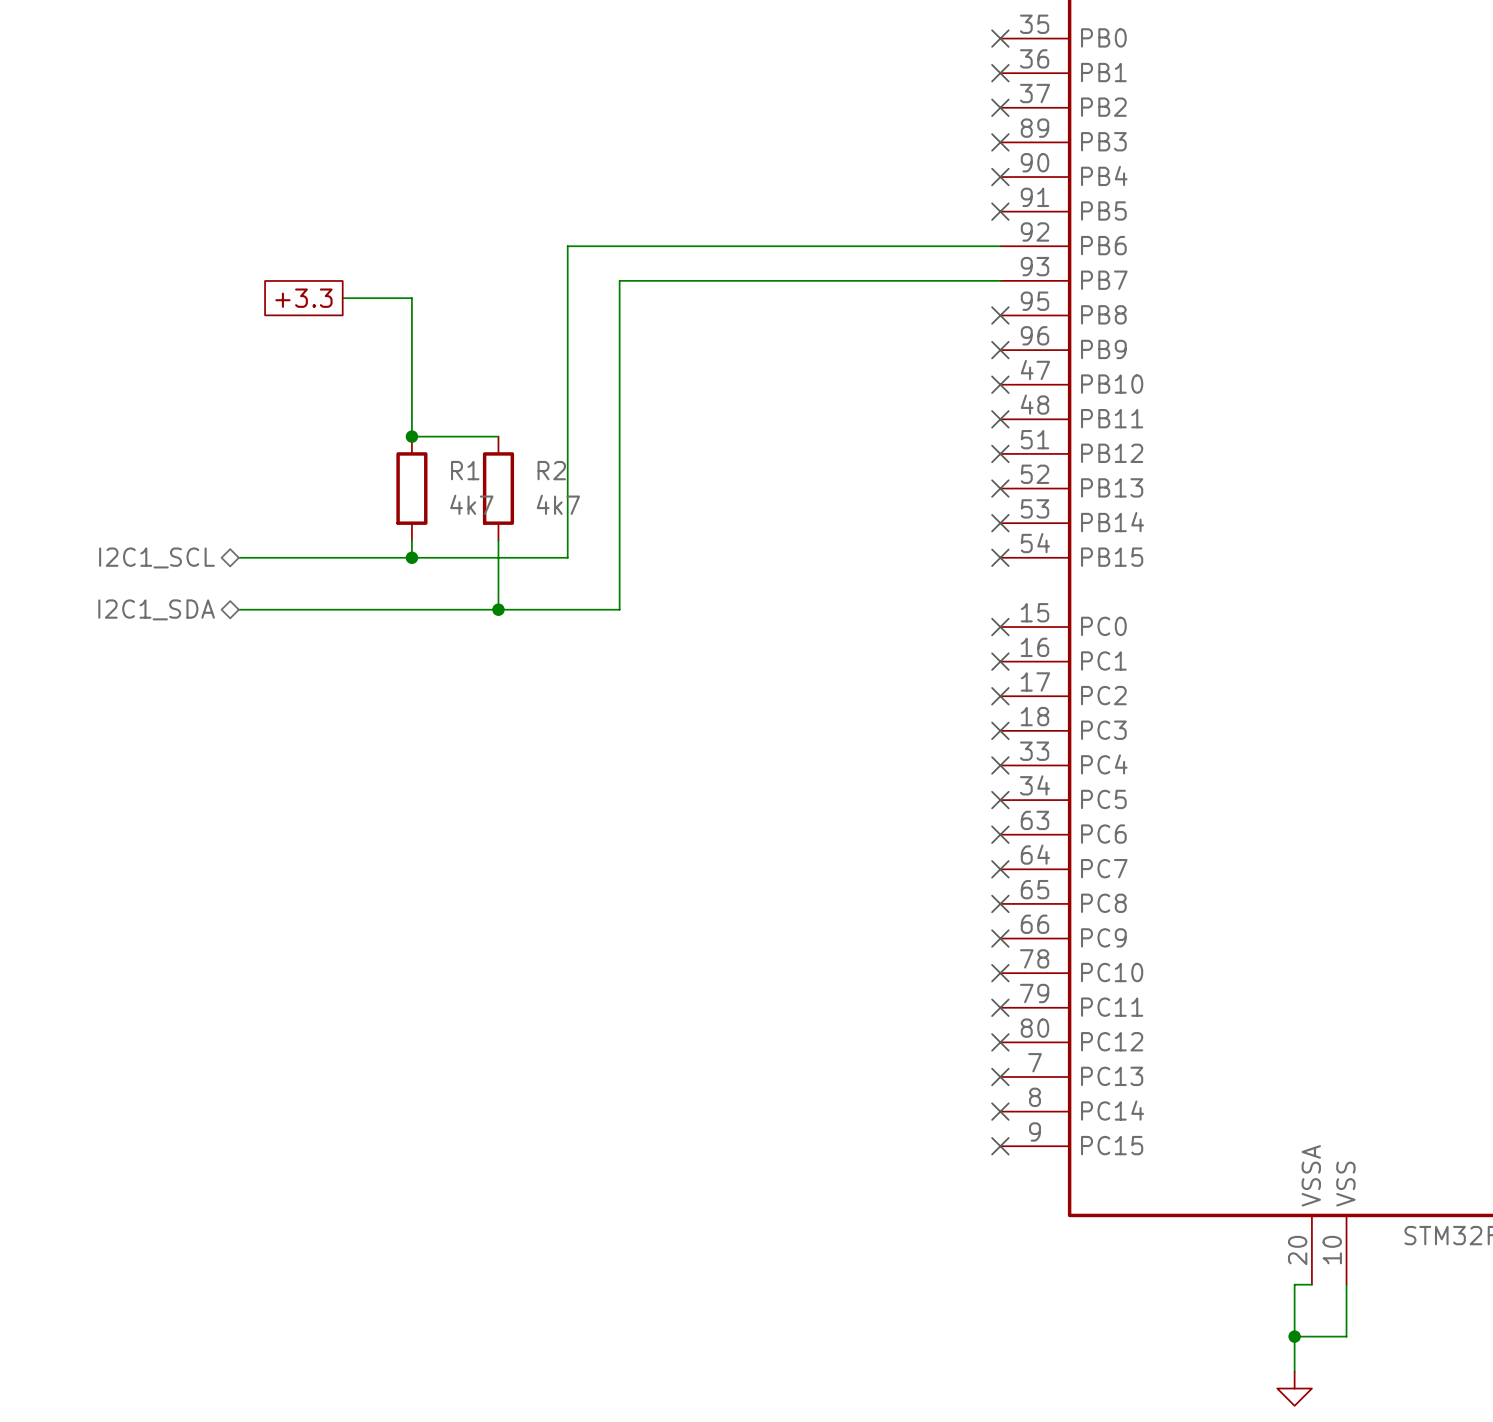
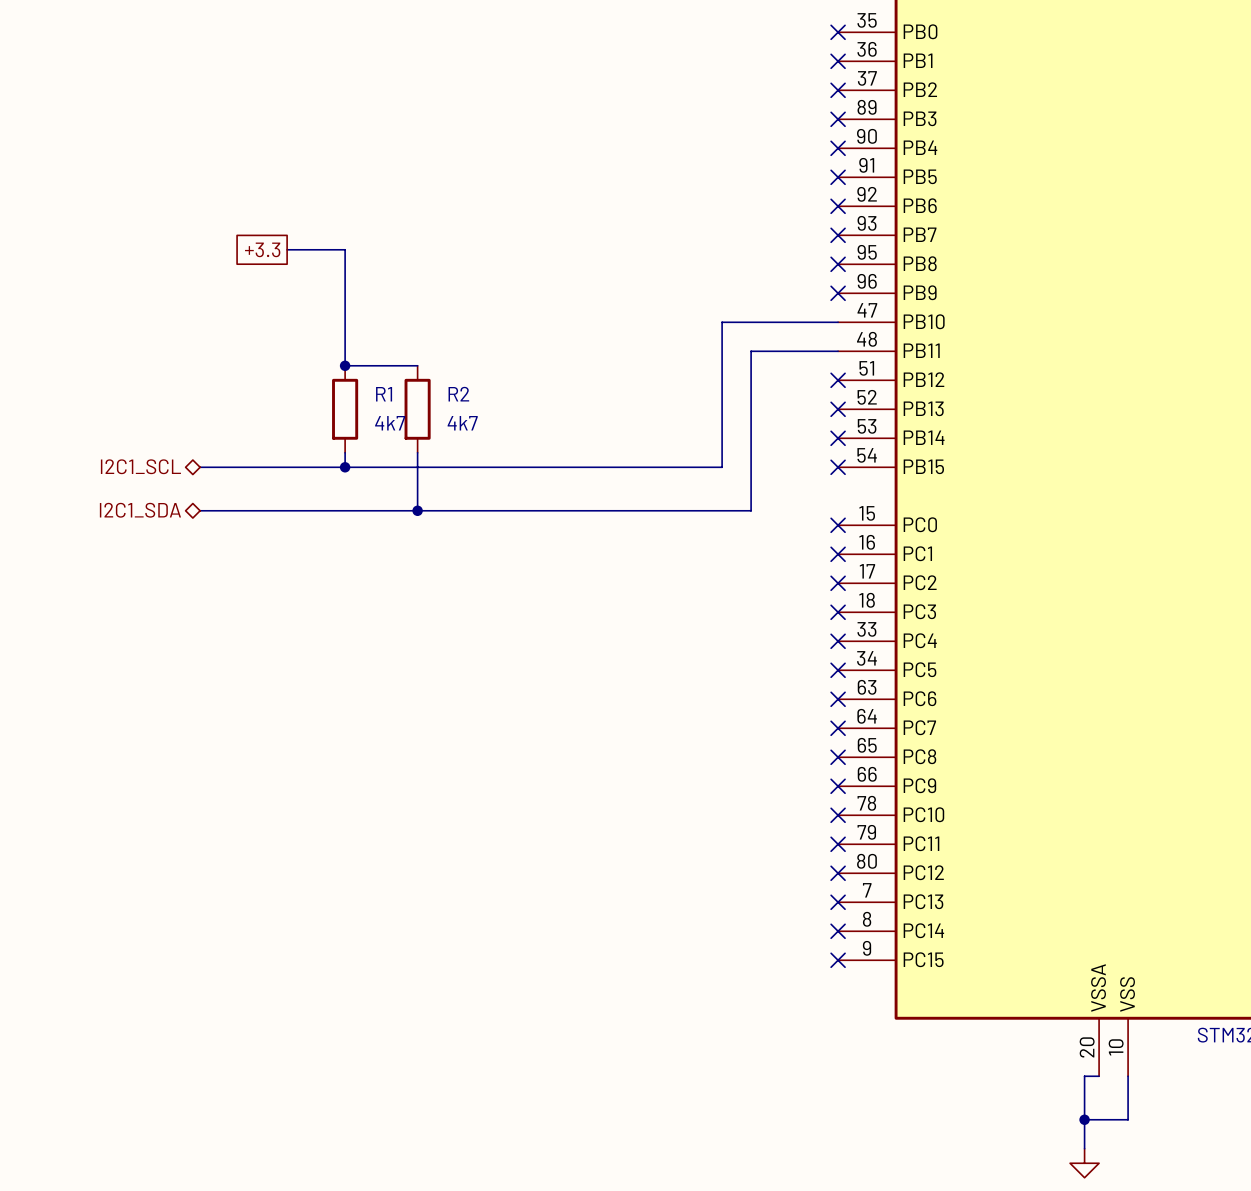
wire: (1000, 246) (567, 246) (567, 557) -> (838, 322) (722, 322) (722, 467) (475, 467)
no-connect mark: none -> (838, 206)
wire: (1000, 280) (619, 280) (619, 609) -> (838, 351) (751, 351) (751, 510) (519, 510)
no-connect mark: none -> (838, 235)
no-connect mark: (1000, 384) -> none
no-connect mark: (1000, 419) -> none

